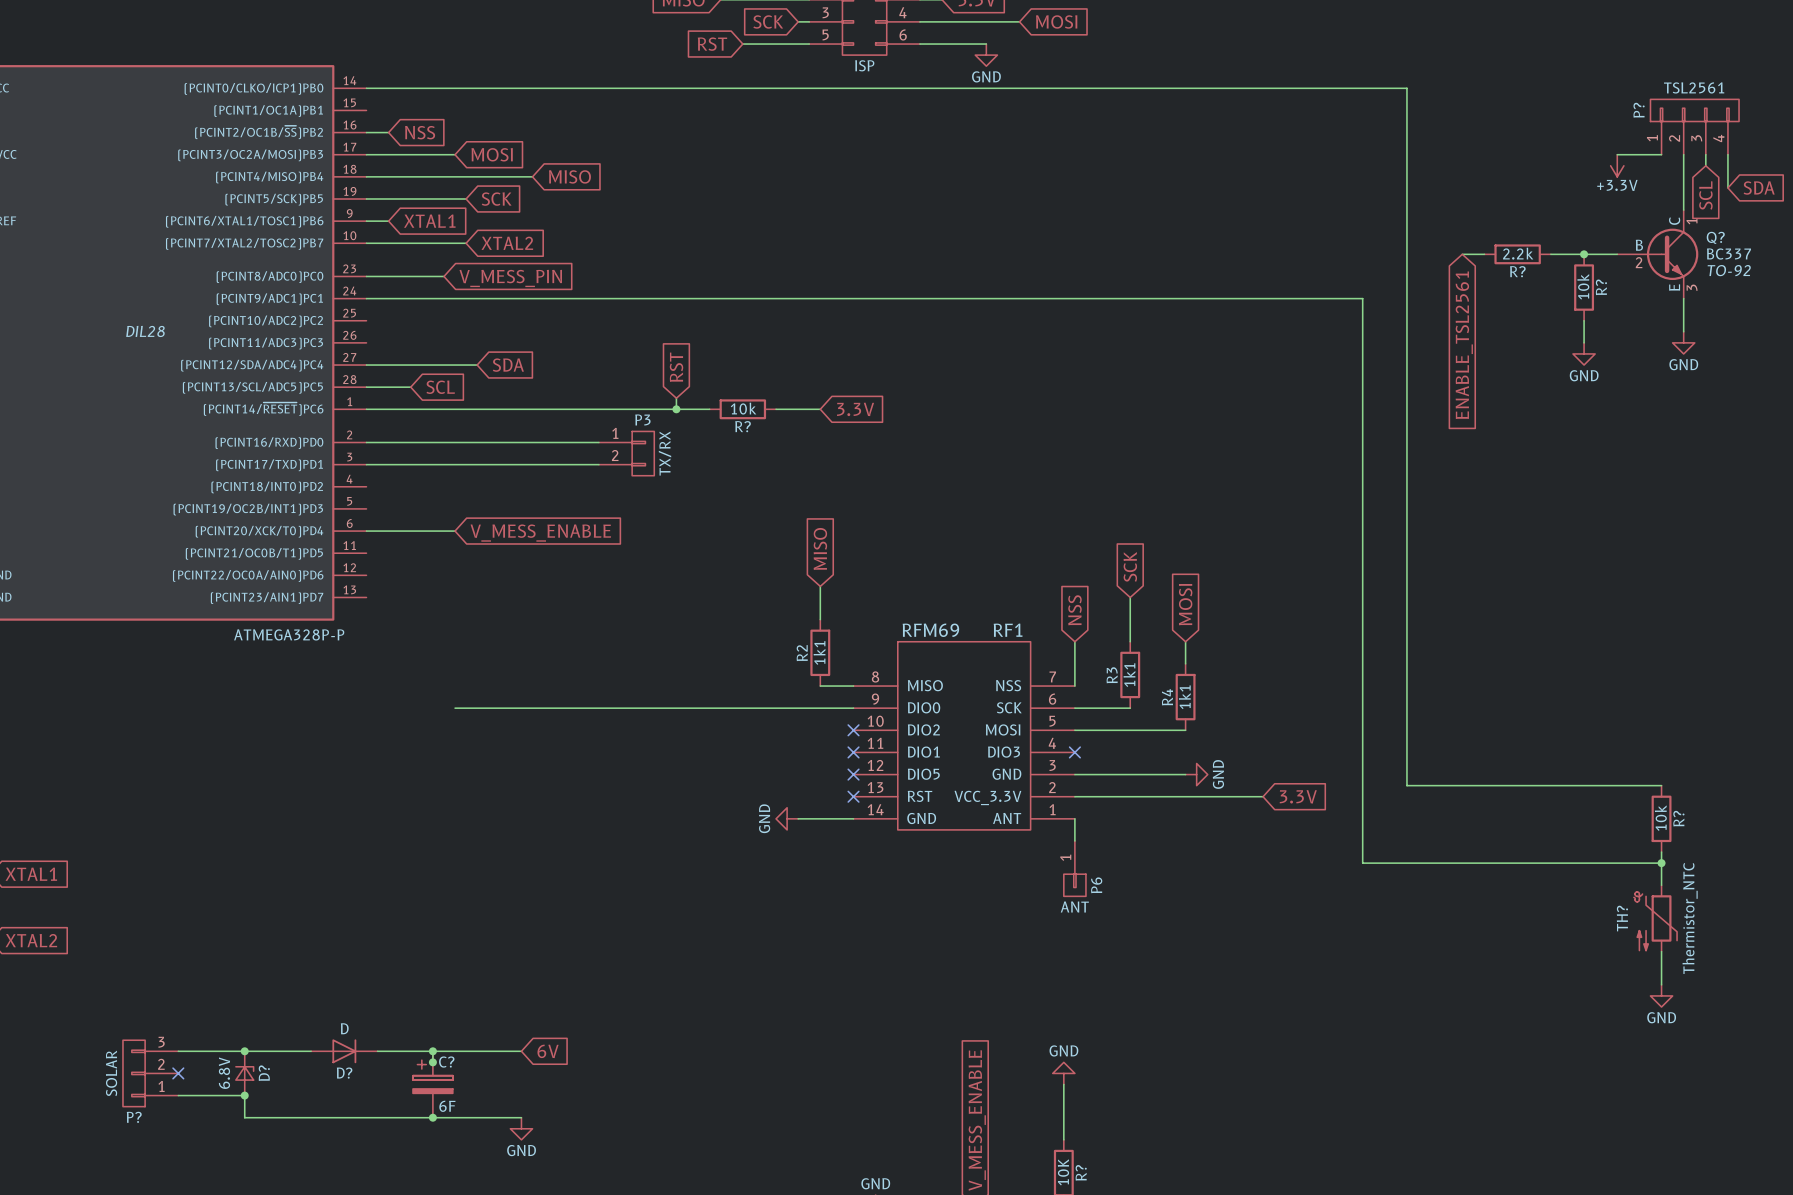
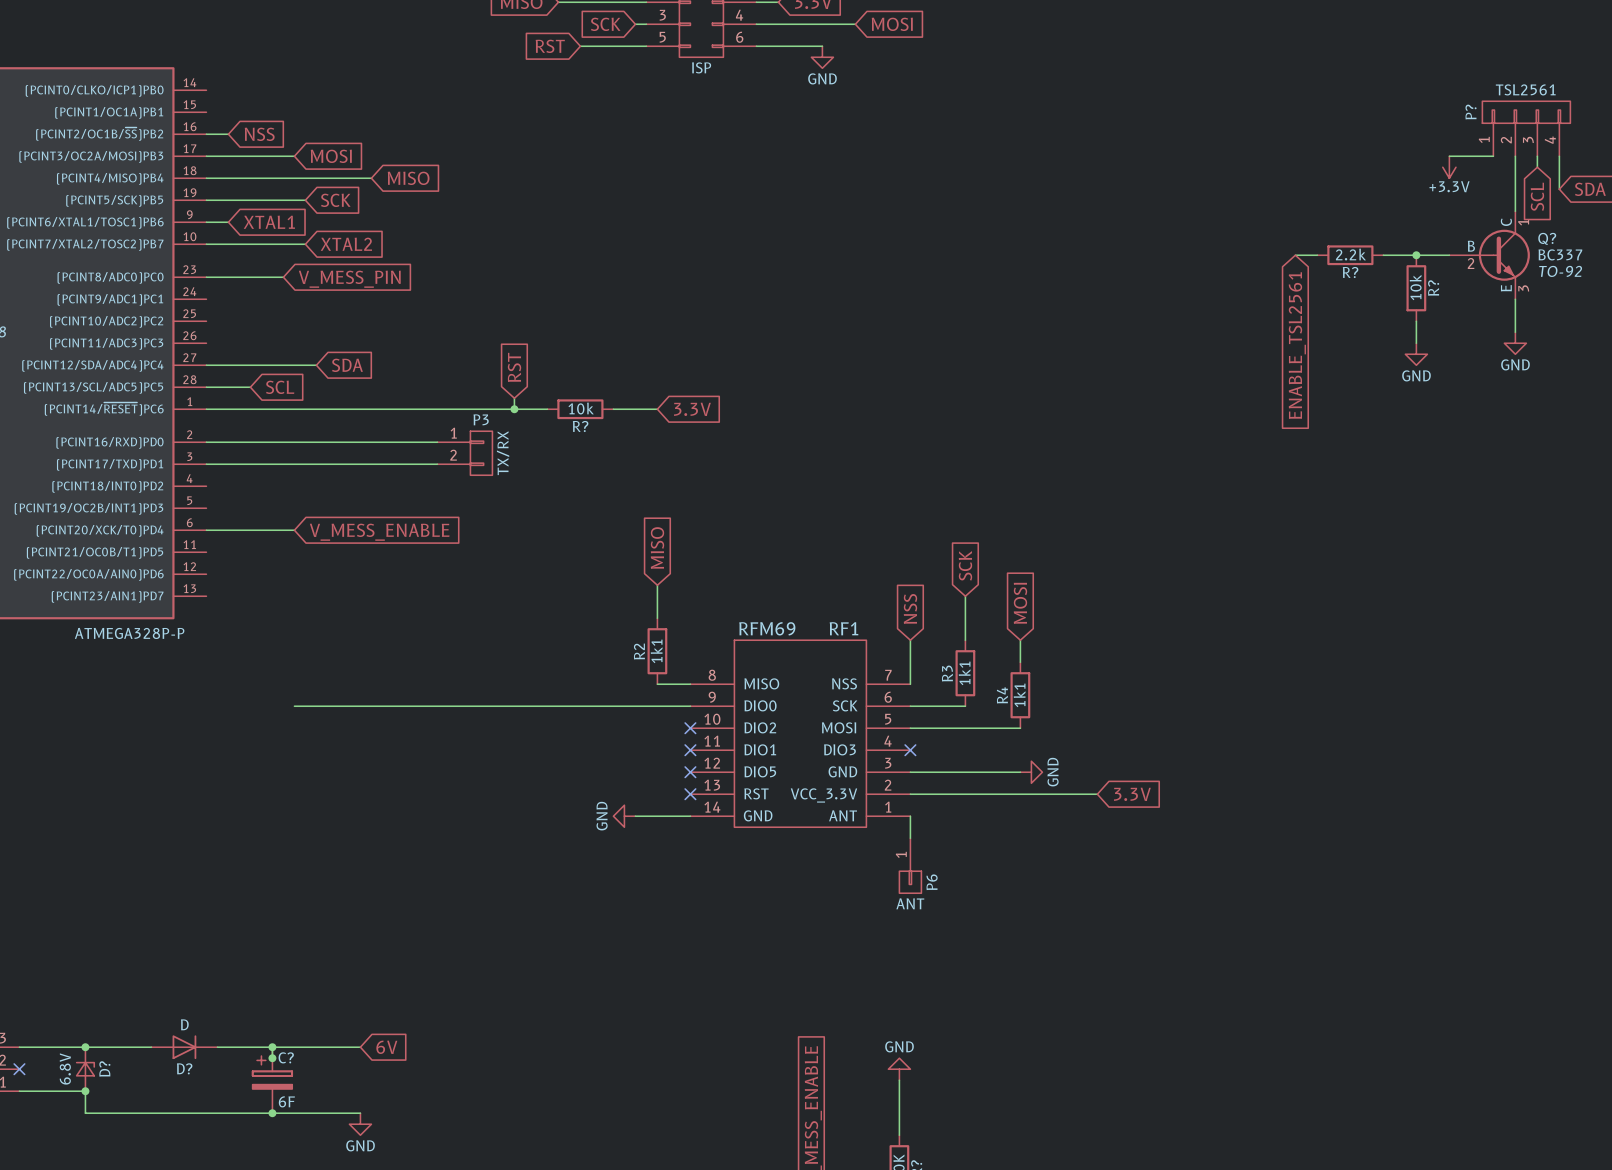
wire: (366, 88) (1406, 88) (1406, 785) (1661, 785) -> none
wire: (366, 298) (1362, 298) (1362, 863) (1661, 863) -> none
R?: 10k (1661, 818) -> none
wire: (1661, 852) (1661, 885) -> none
junction: (1661, 863) -> none
TH?: Thermistor_NTC (1655, 918) -> none
wire: (1661, 951) (1661, 984) -> none
power symbol: GND (1661, 995) -> none

